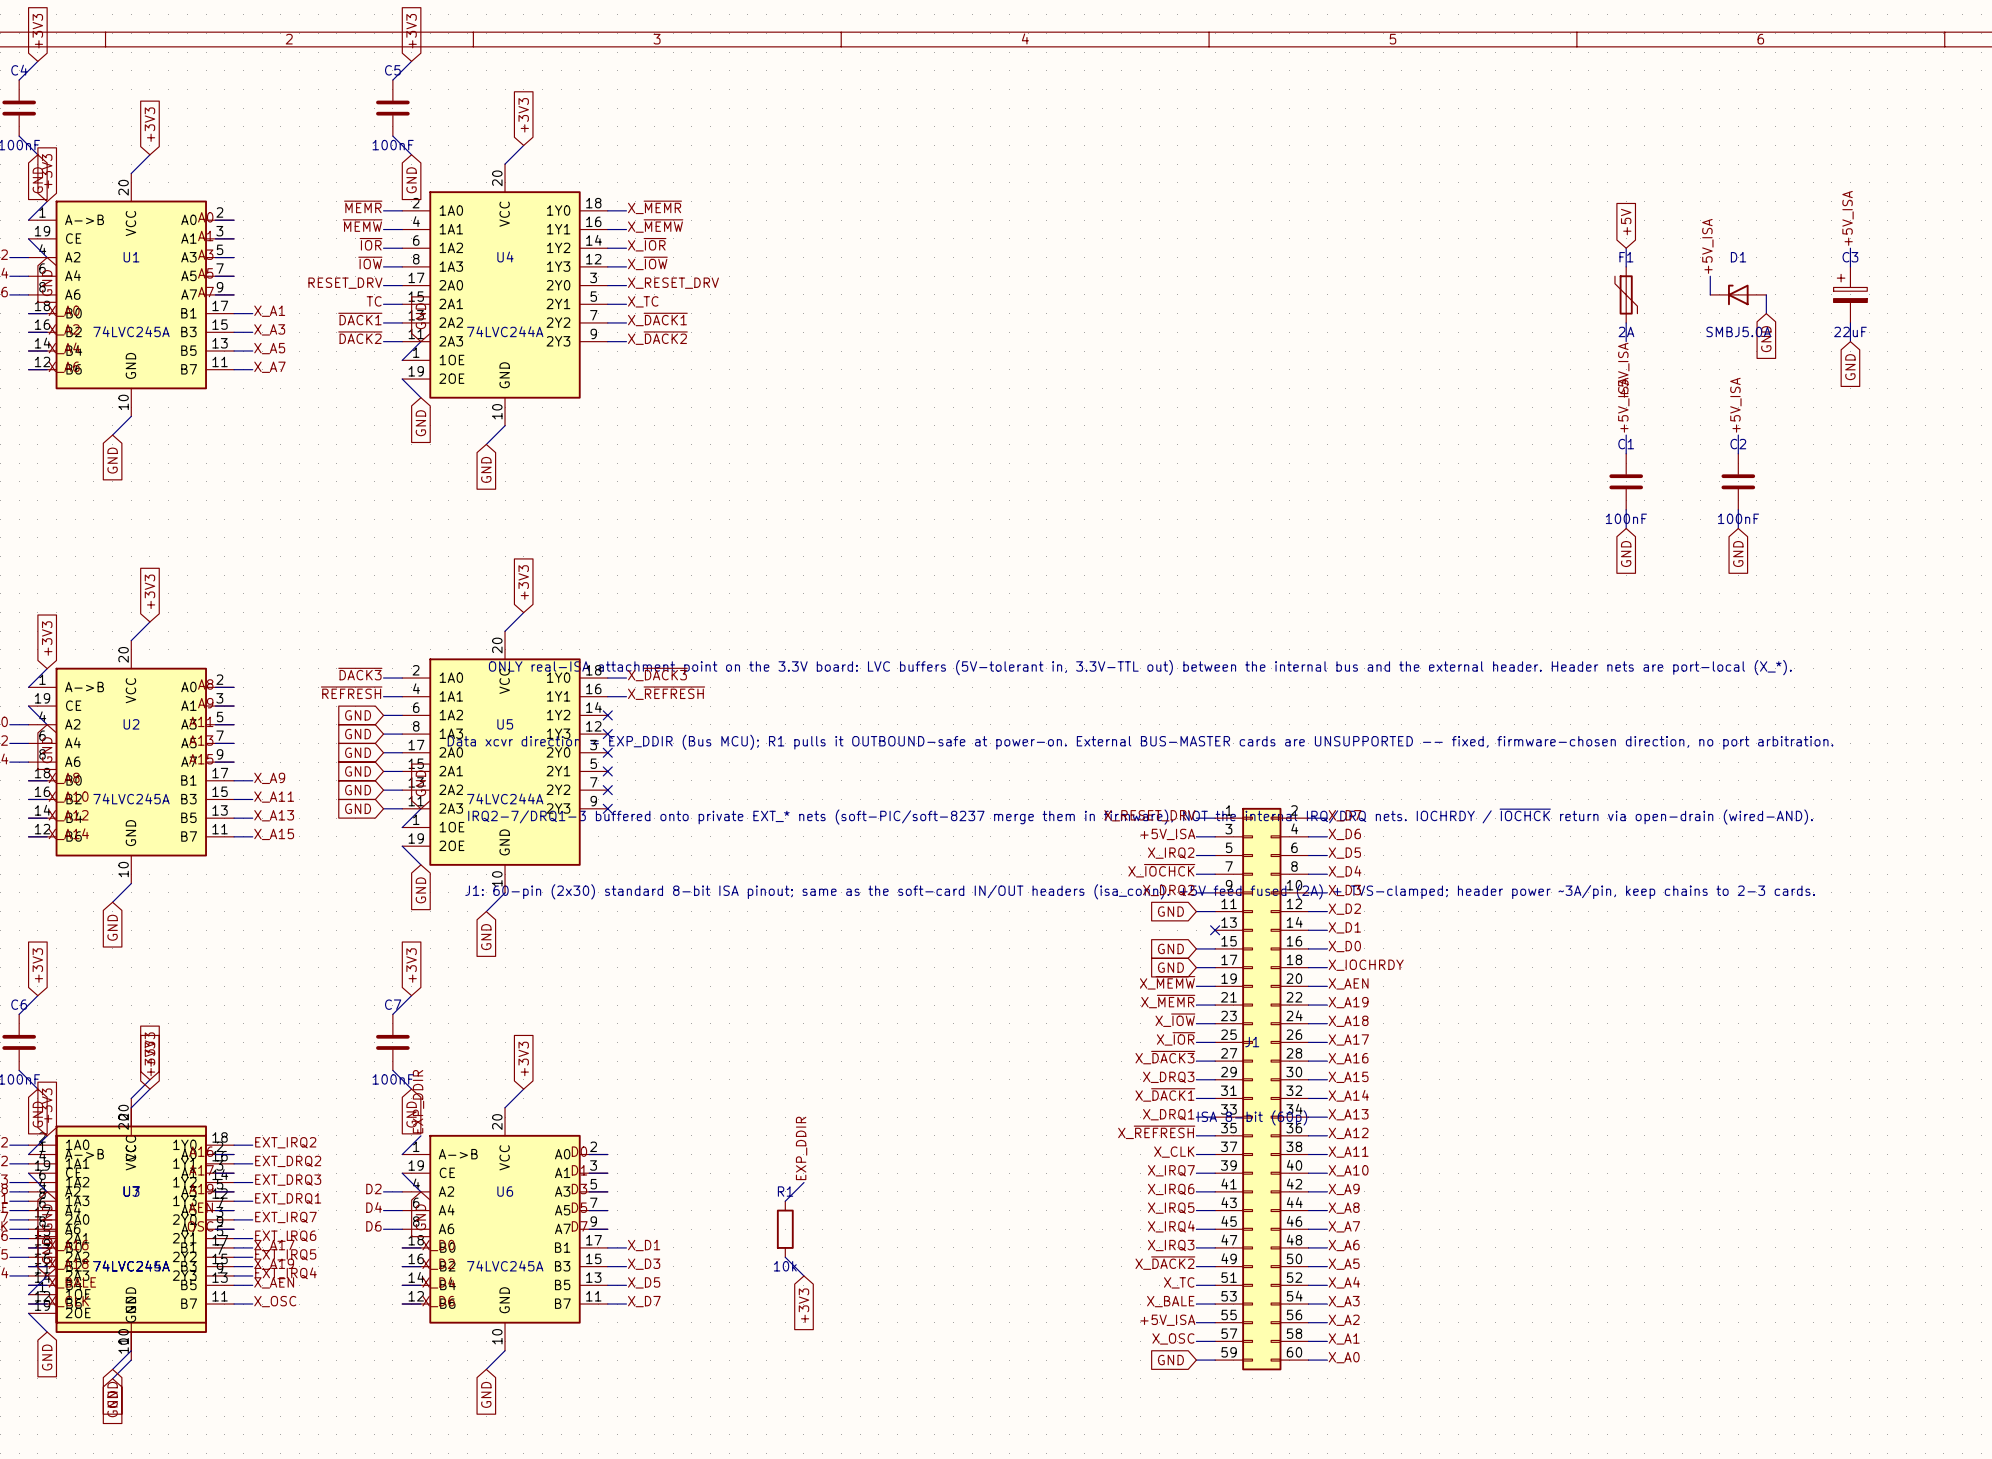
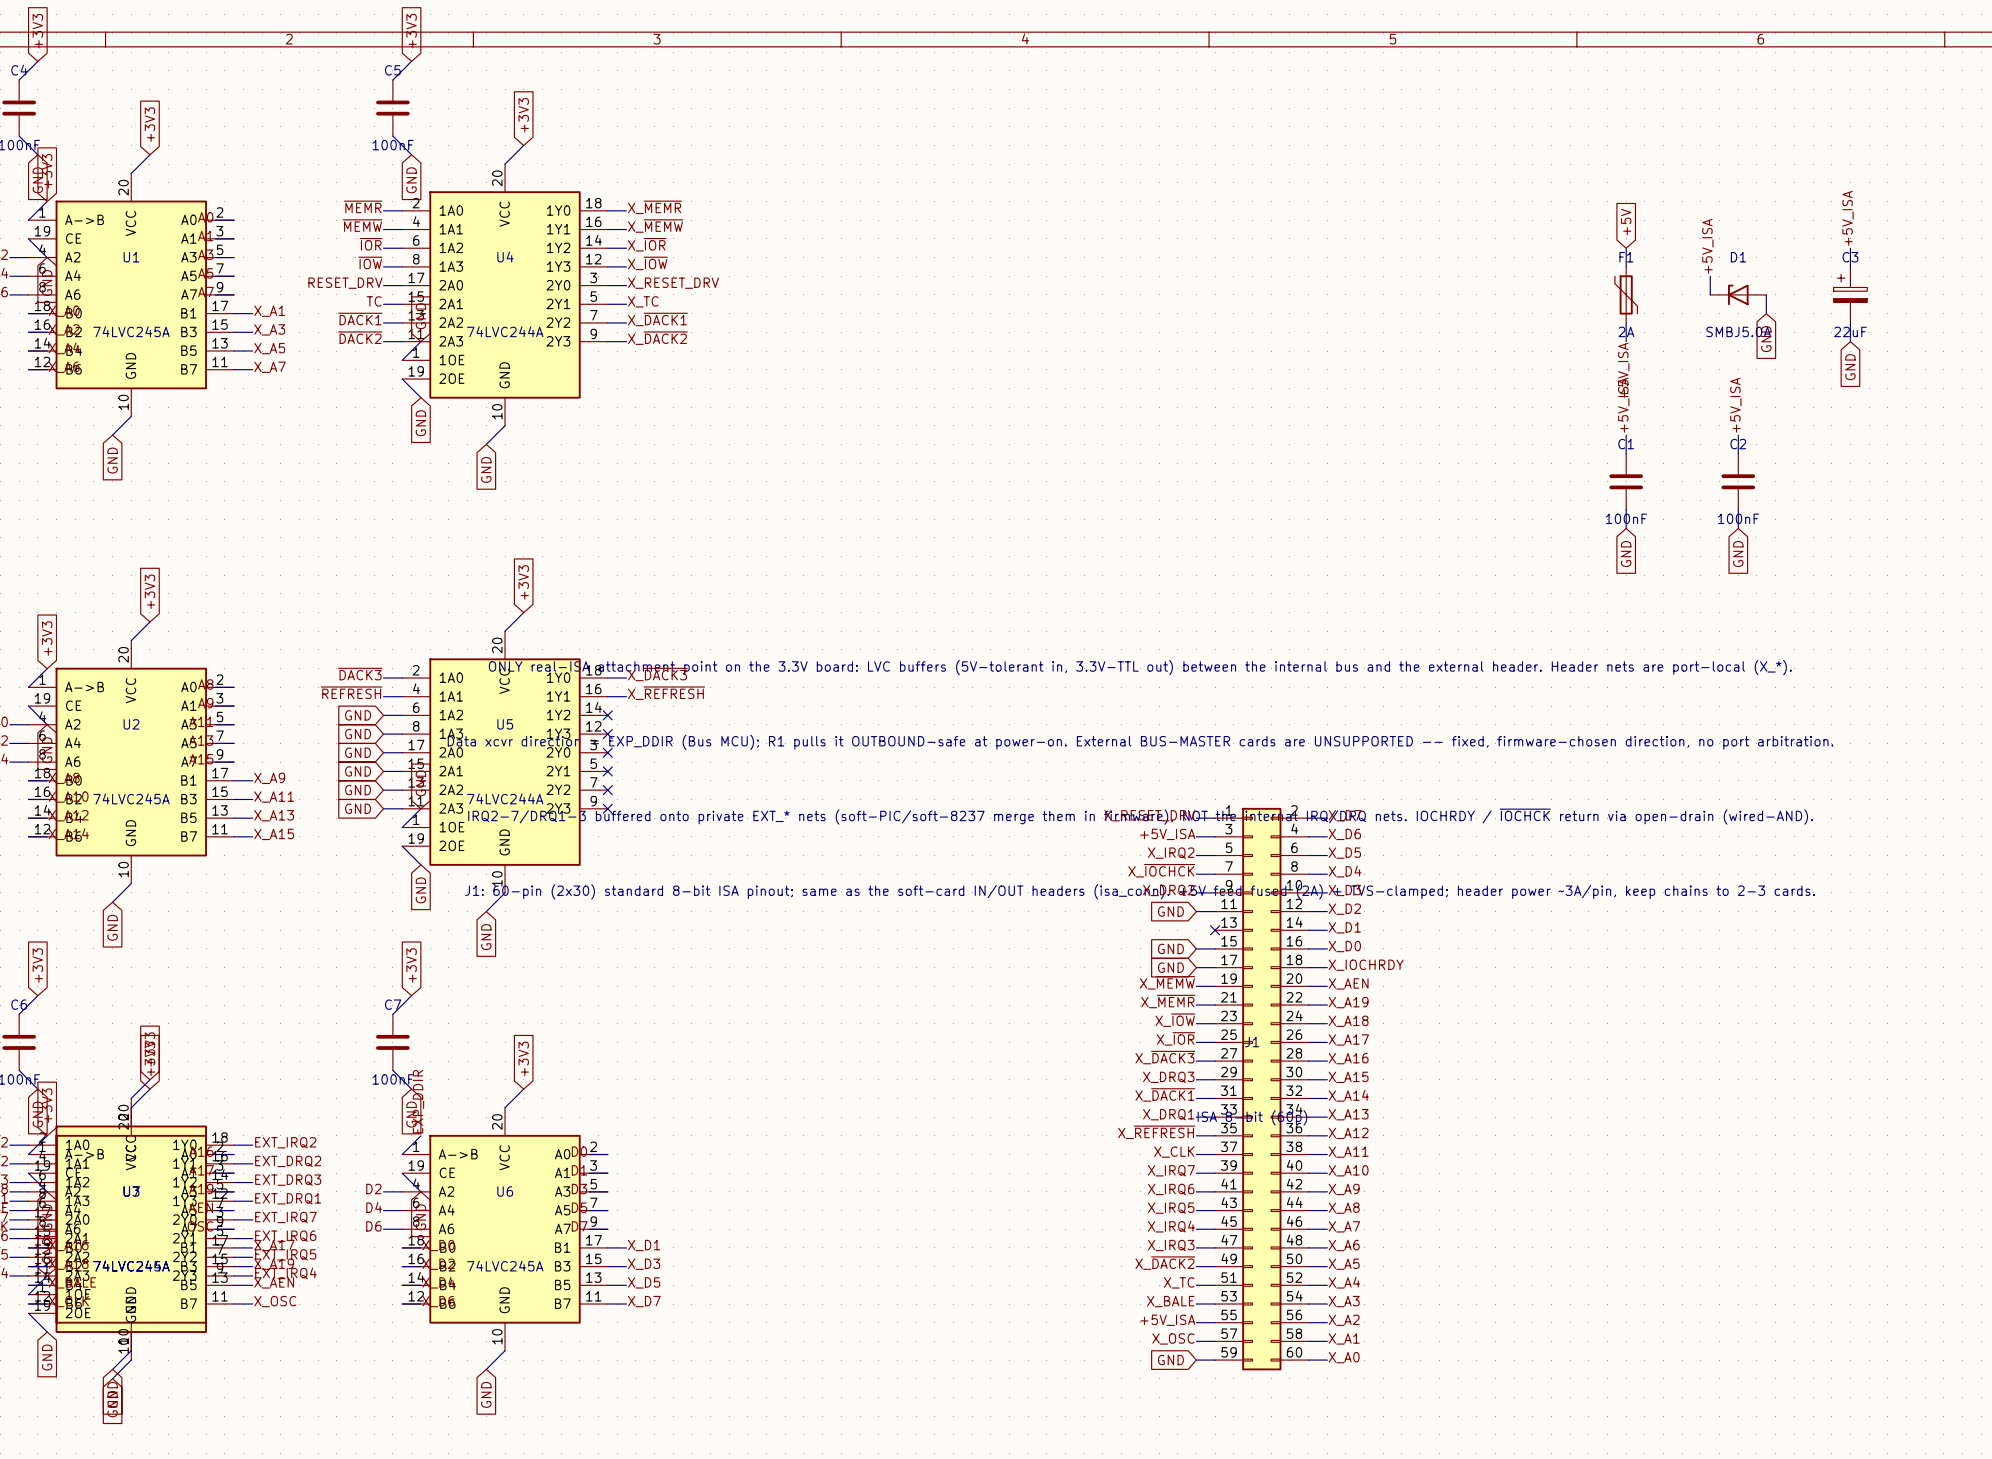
label: EXP_DDIR (801, 1148) -> none
wire: (803, 1182) (785, 1201) -> none
R1: 10k (785, 1229) -> none
wire: (785, 1257) (803, 1275) -> none
global label: +3V3 (803, 1305) -> none

